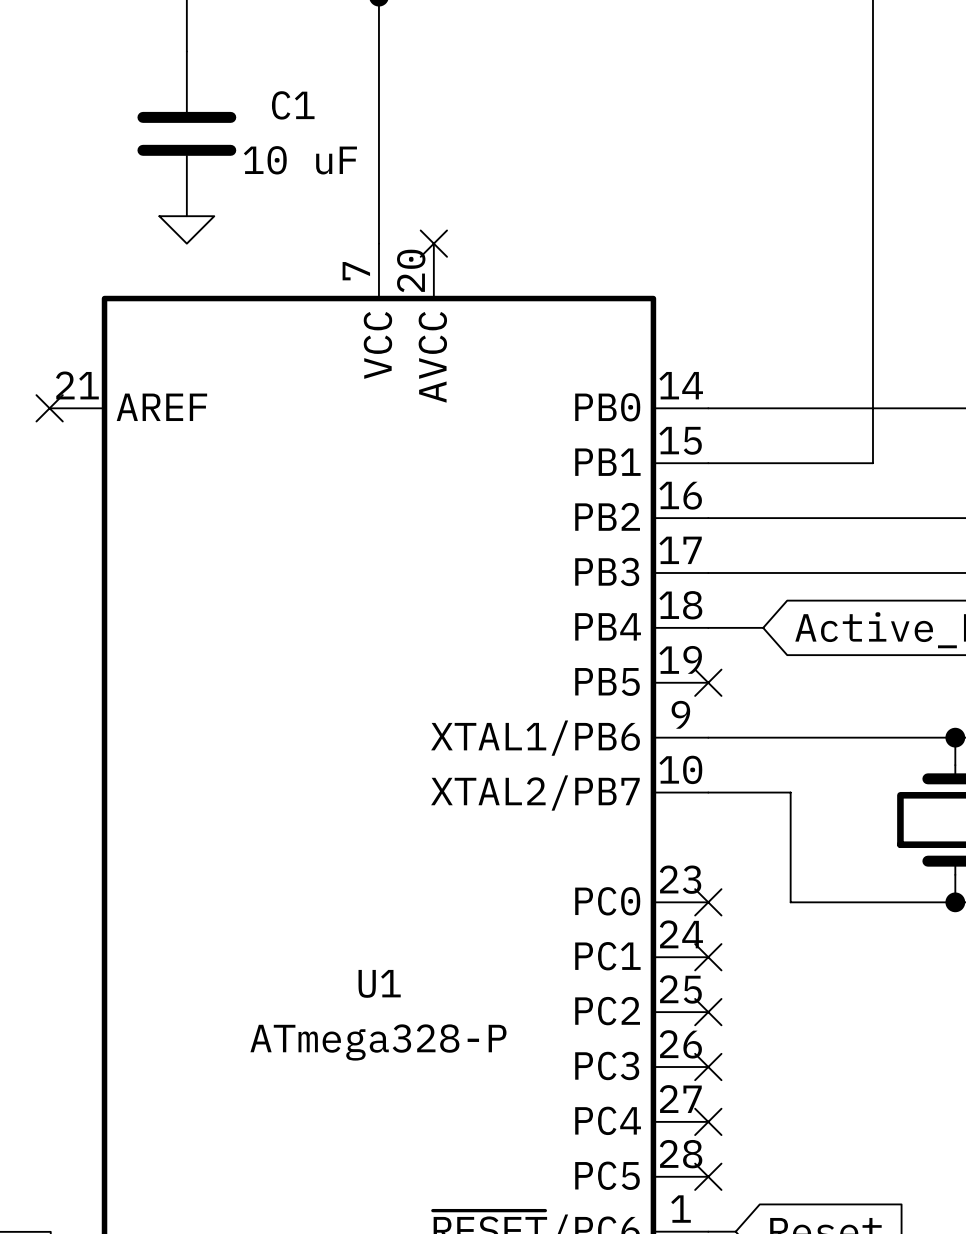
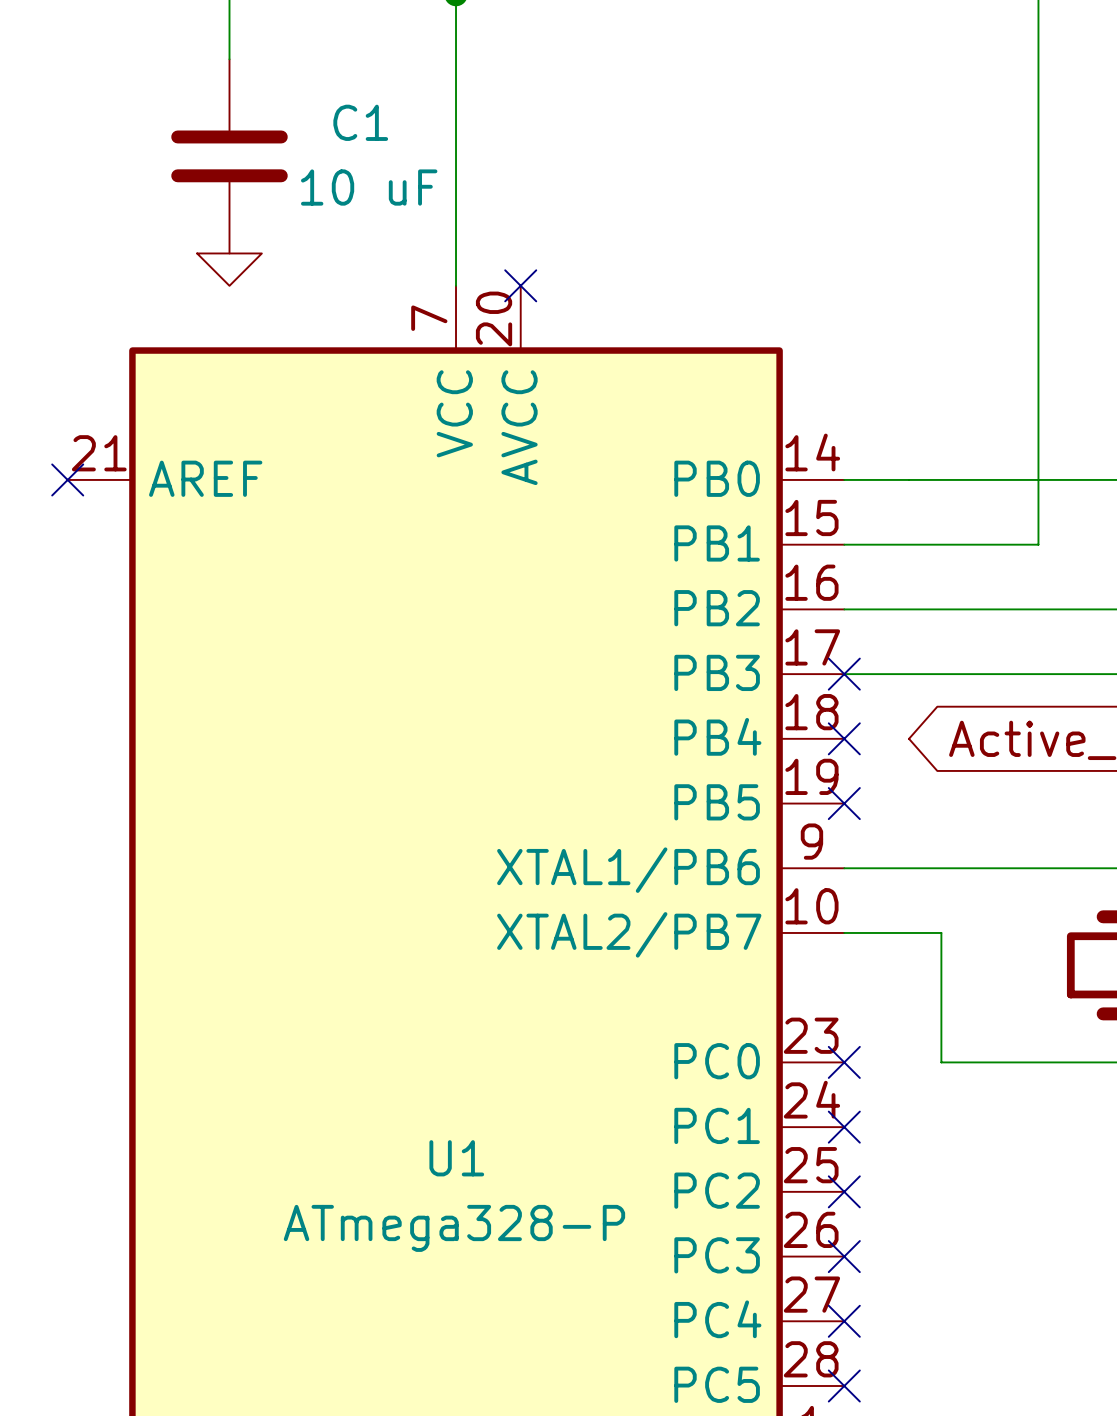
no-connect mark: none -> (844, 674)
wire: (708, 627) (763, 627) -> none
no-connect mark: none -> (844, 738)

